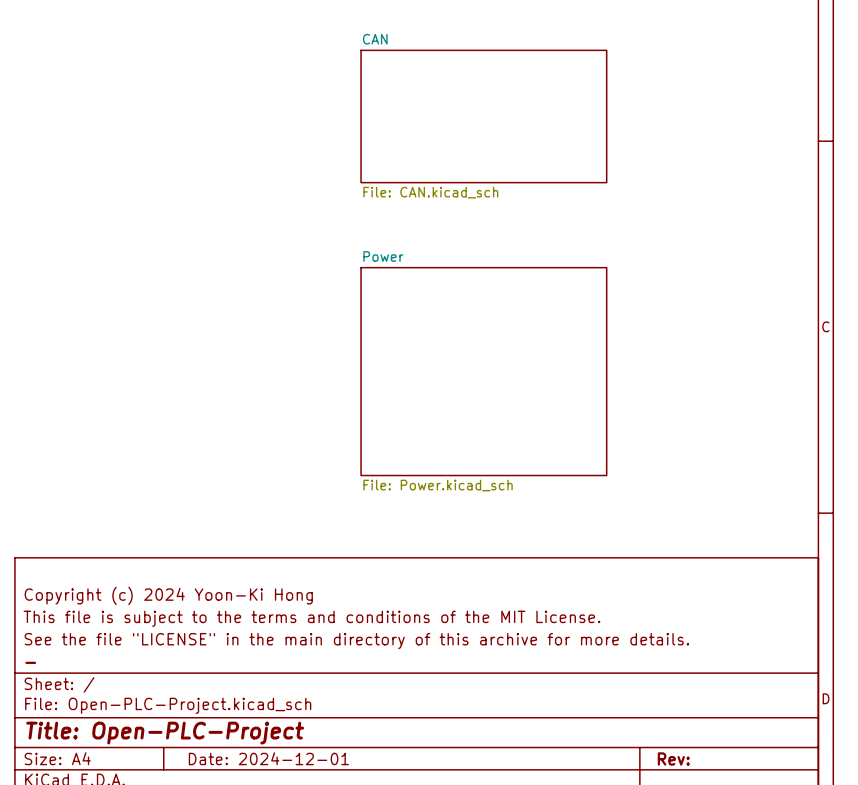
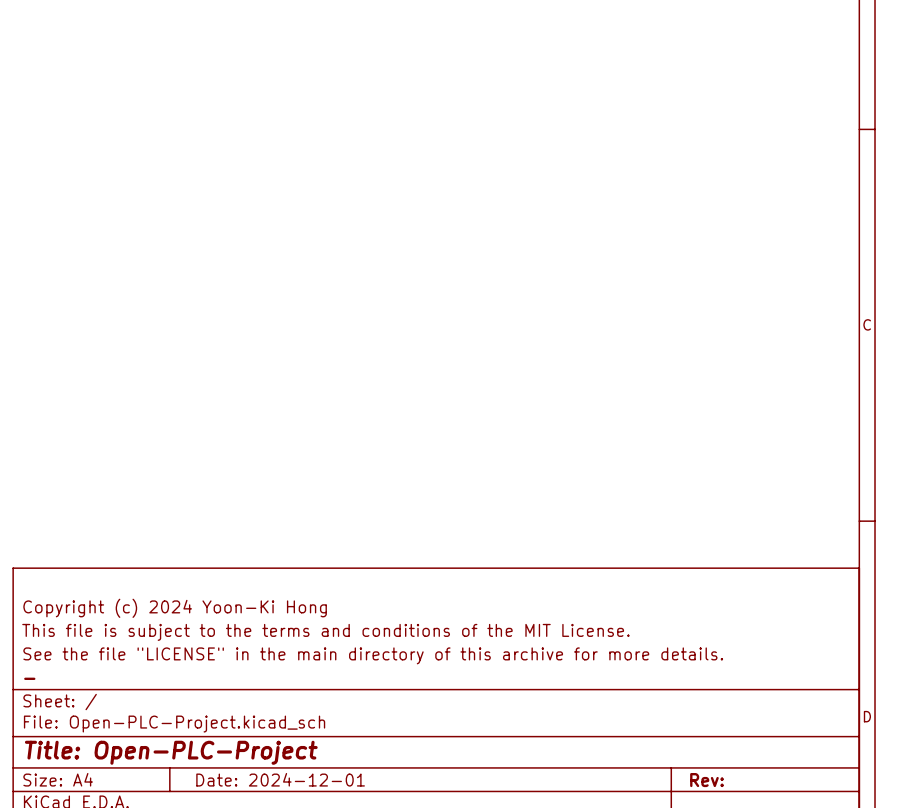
sheet CAN: File: CAN.kicad_sch (483, 116) -> none
sheet Power: File: Power.kicad_sch (483, 371) -> none

